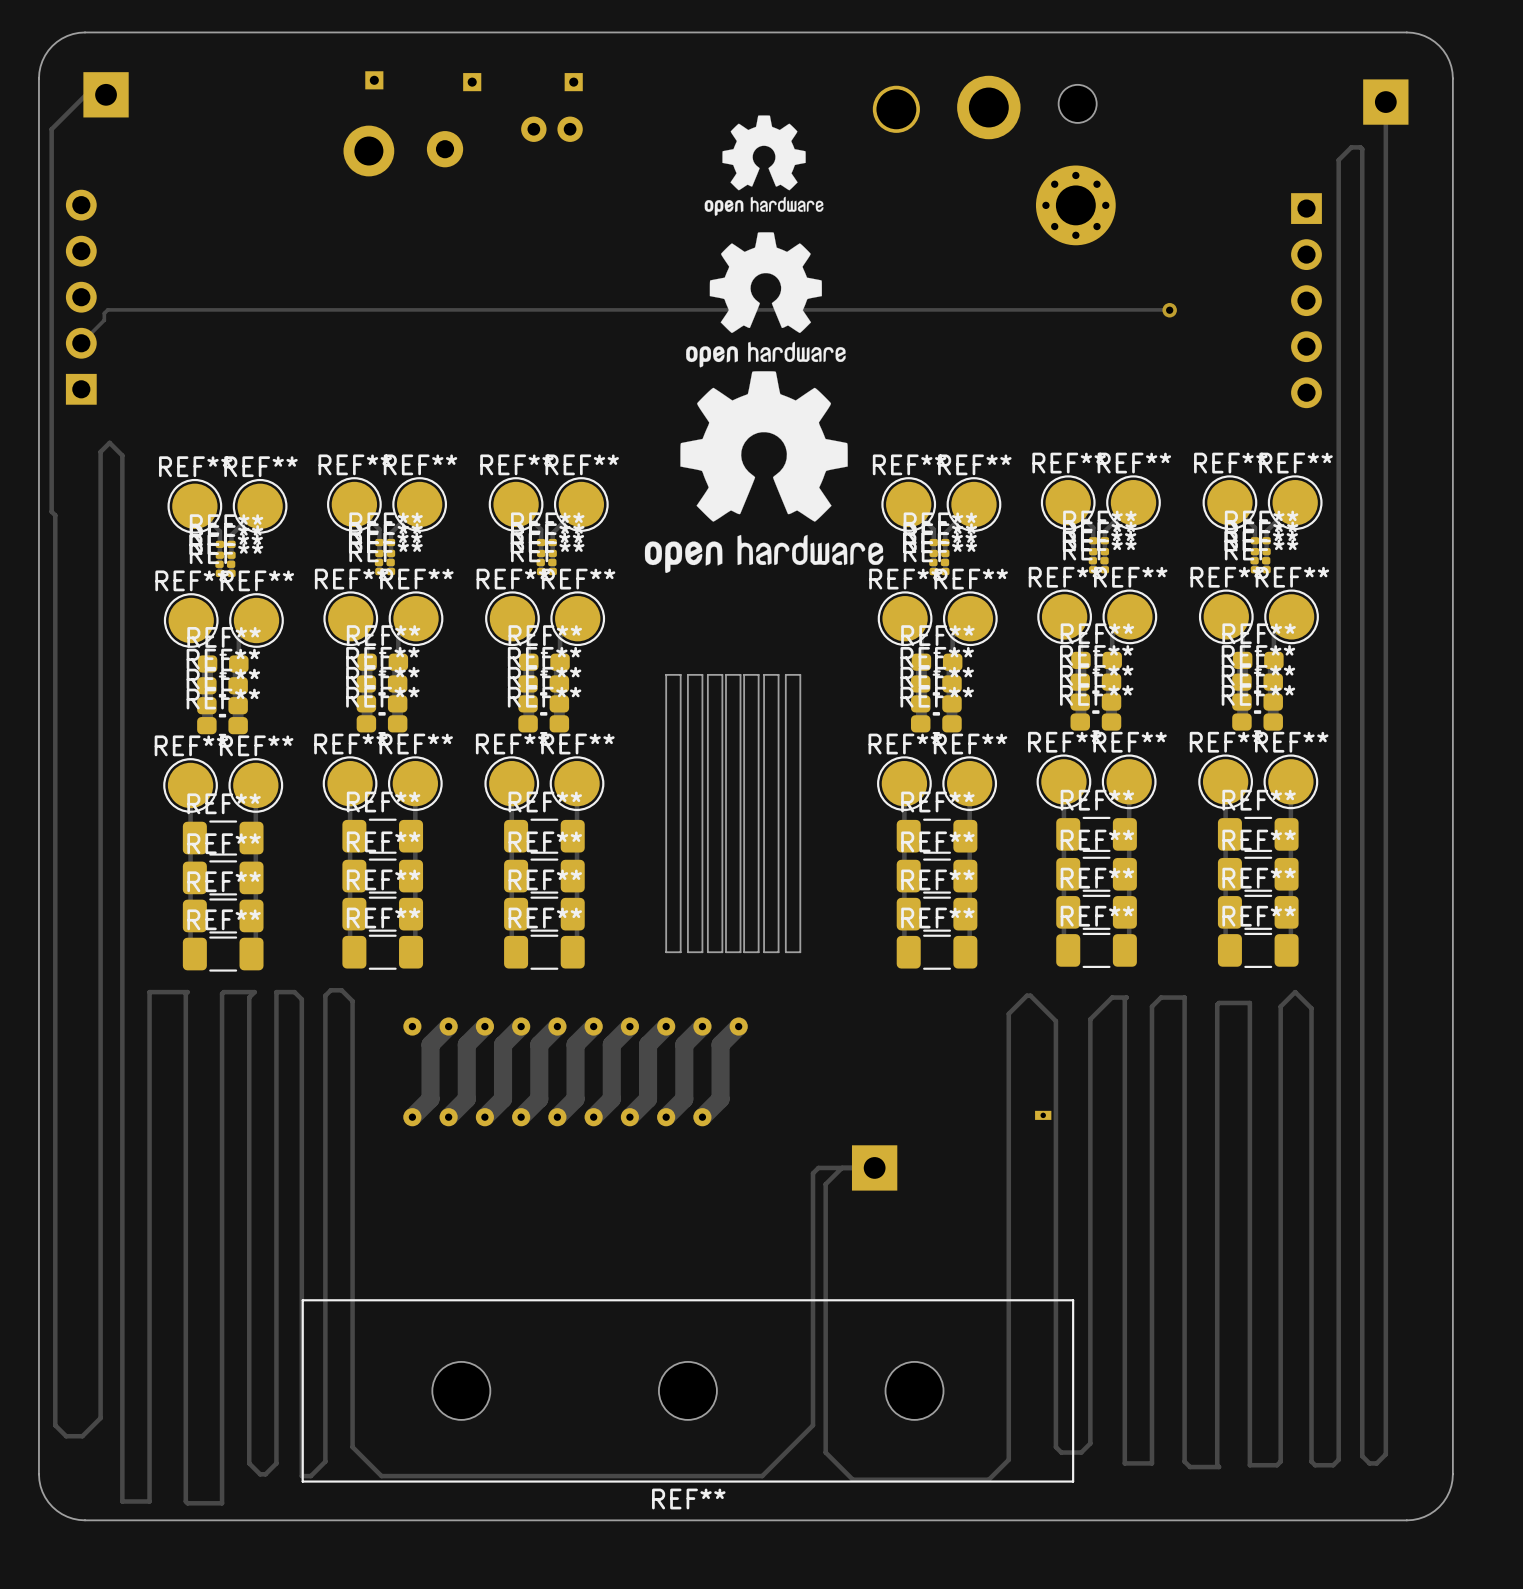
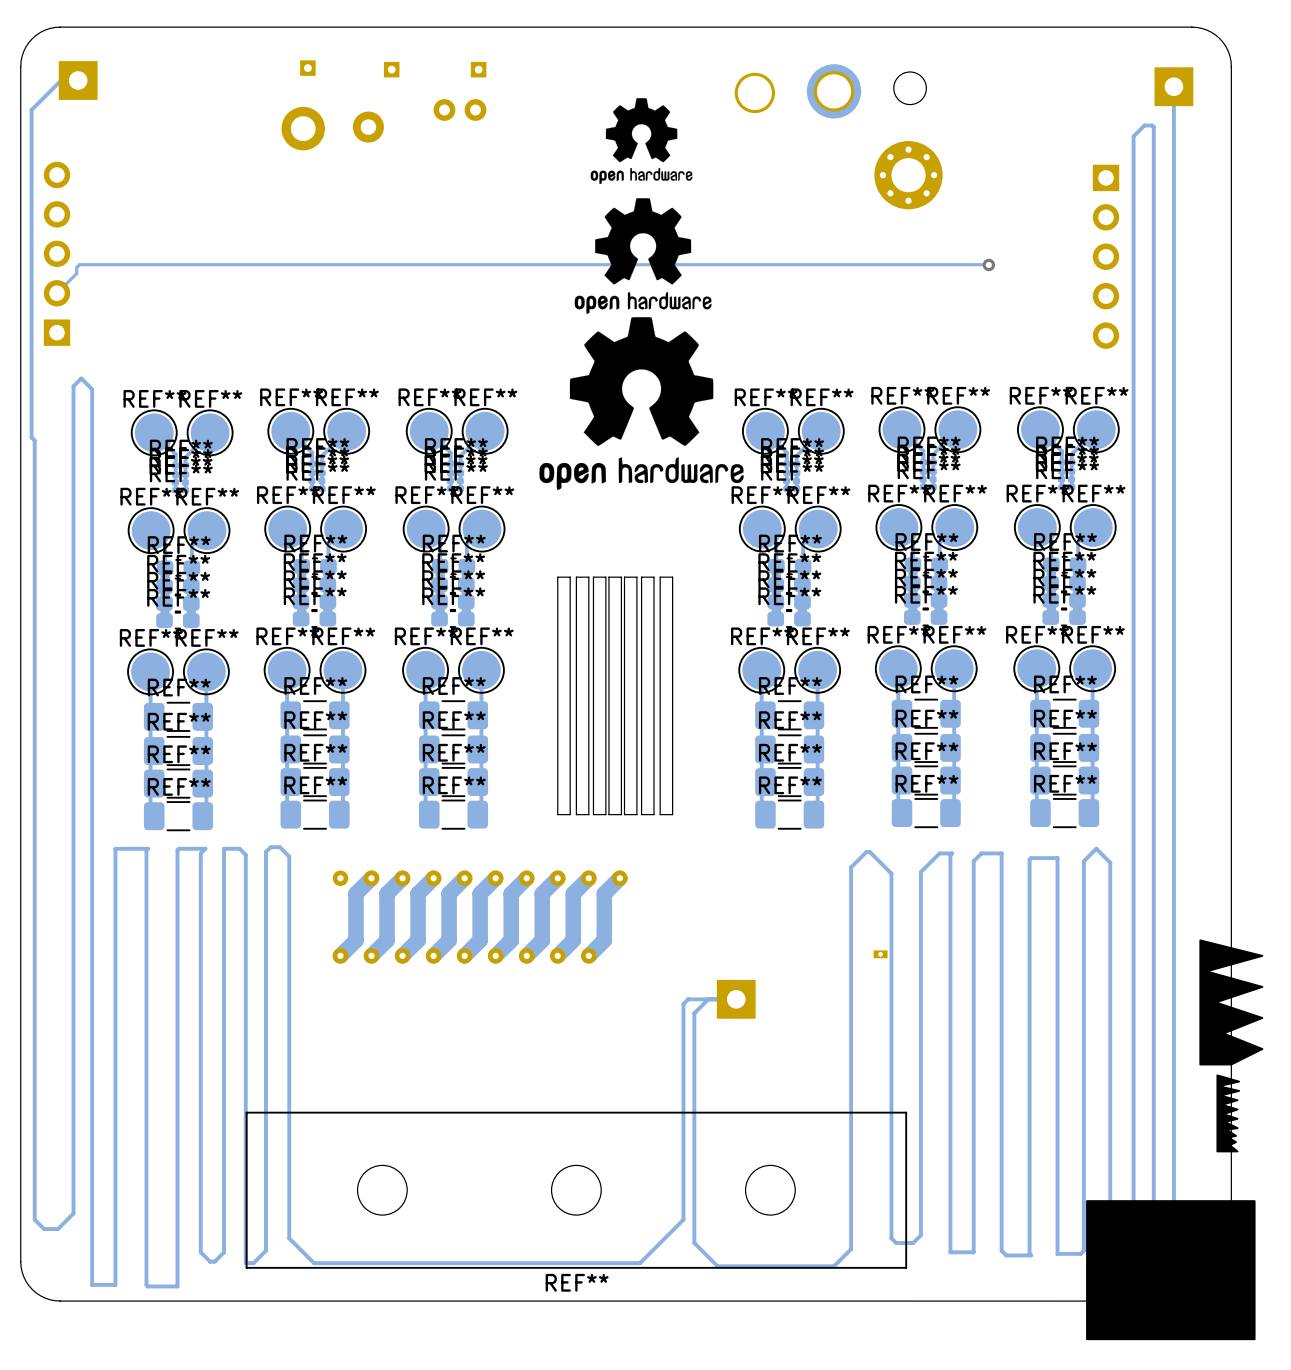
drawing: none -> [1199, 939, 1264, 1153]
drawing: none -> [1086, 1200, 1256, 1341]

